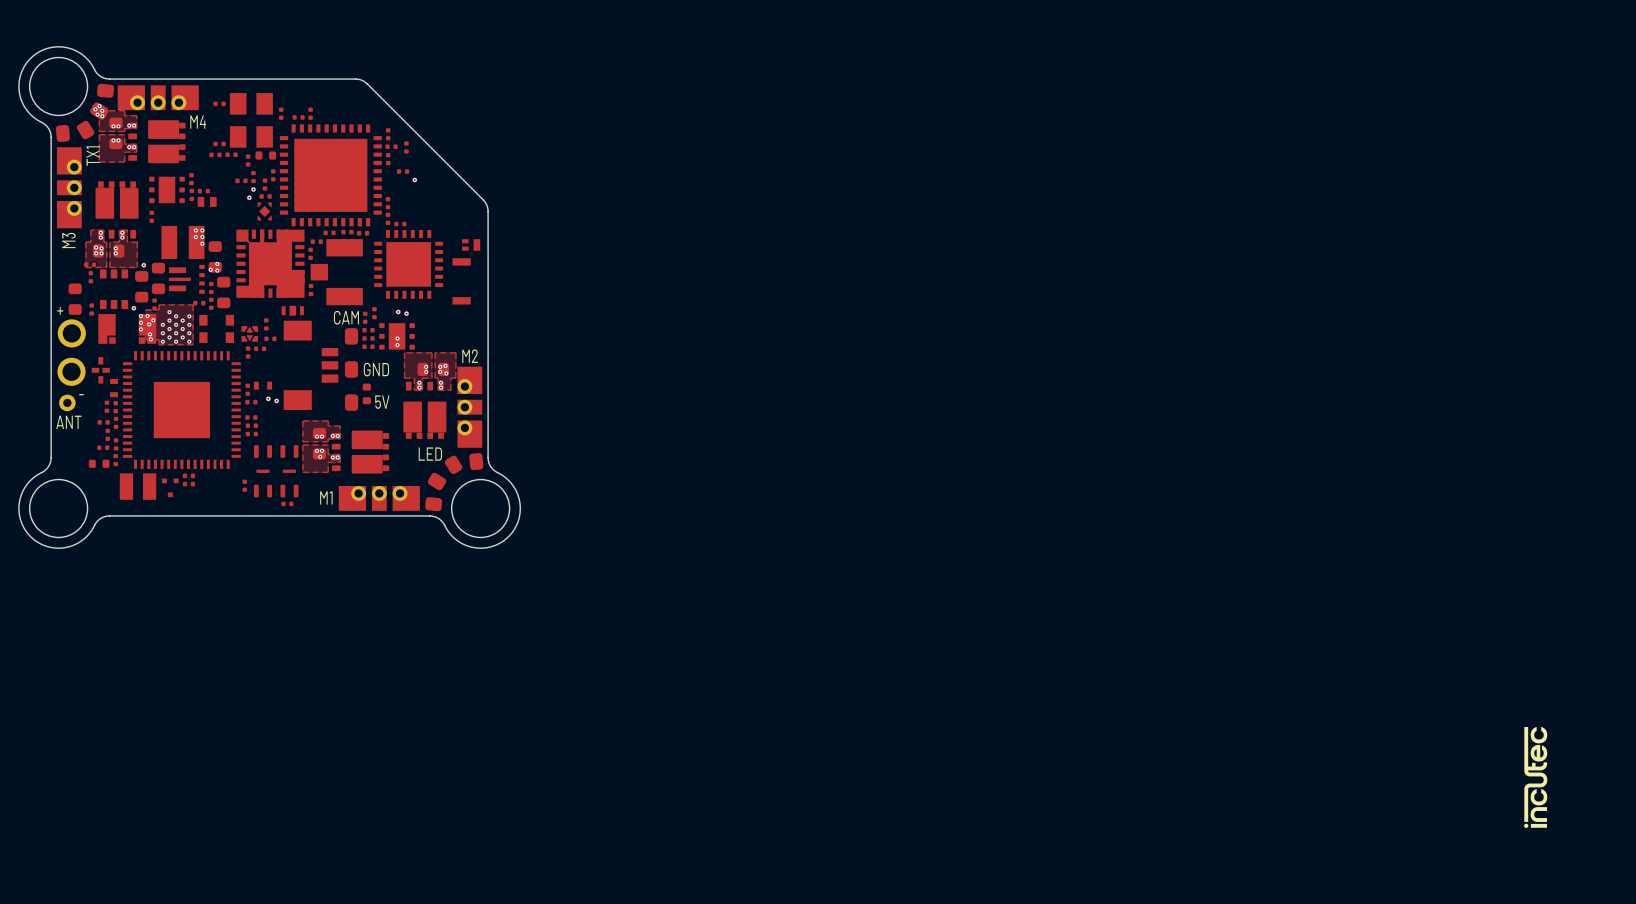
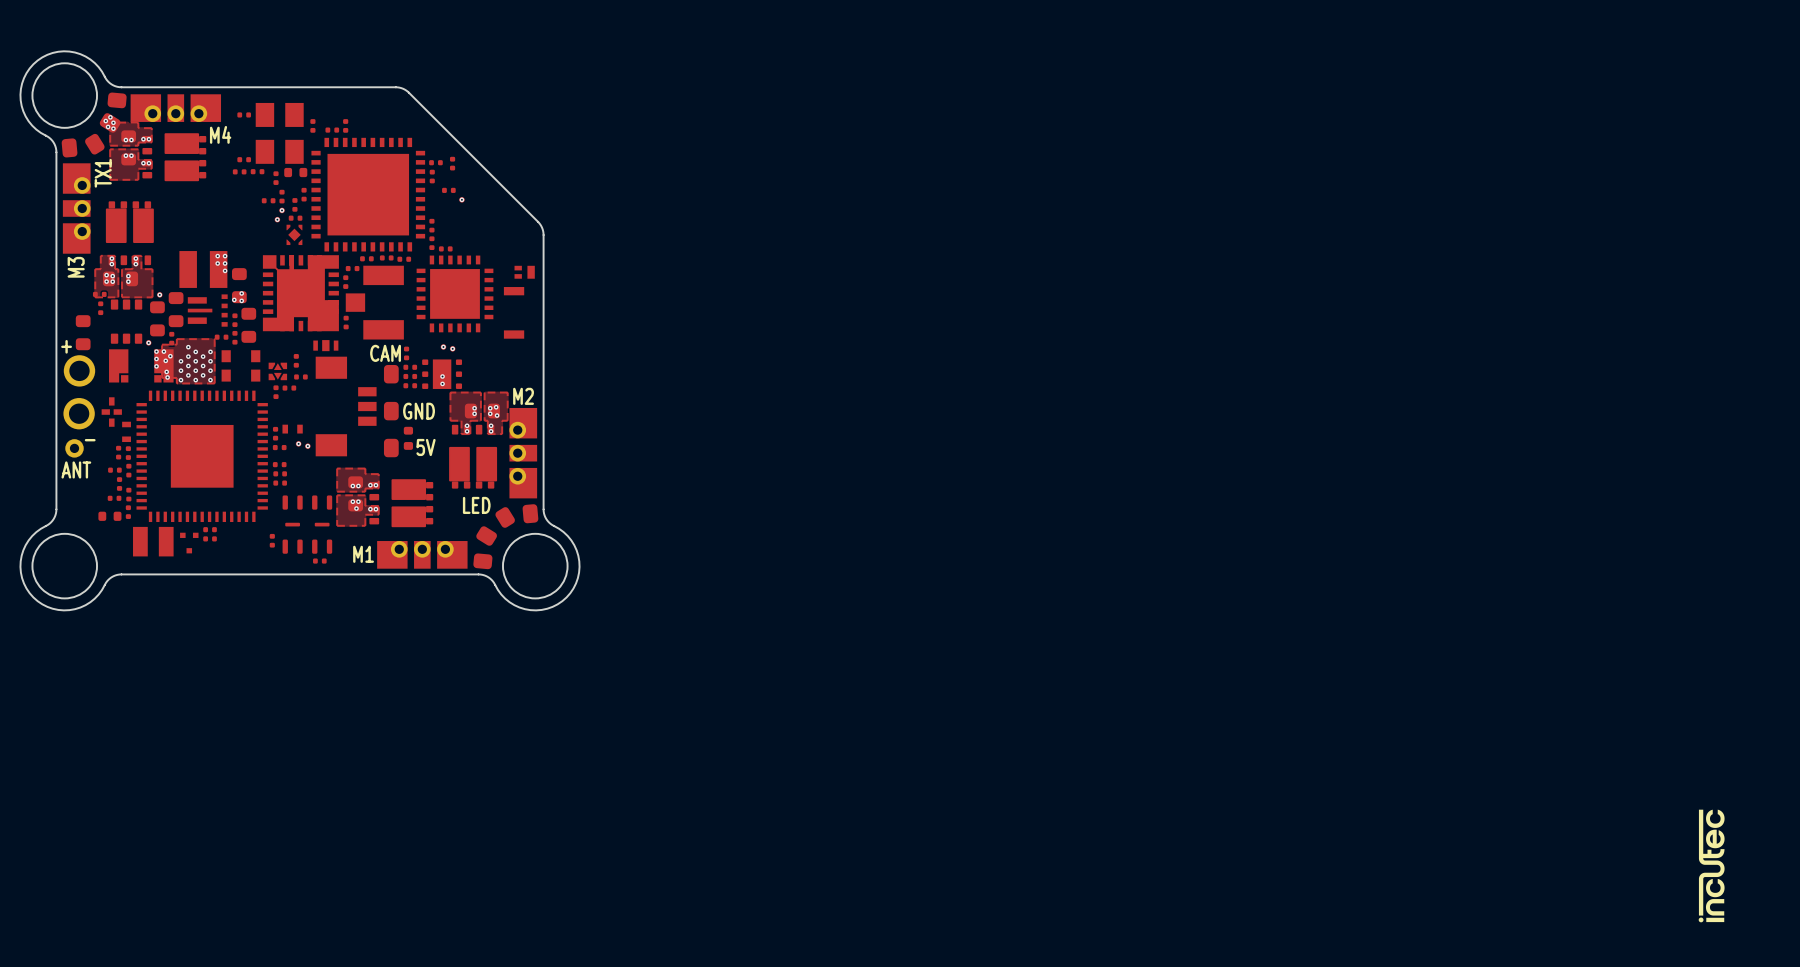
part: (388, 134) -> none
part: (191, 179) -> none
part: (167, 189) -> none
part: (203, 191) -> none
part: (191, 194) -> none
part: (207, 201) -> none
part: (151, 216) -> none
part: (91, 309) -> none
part: (374, 313) -> none

